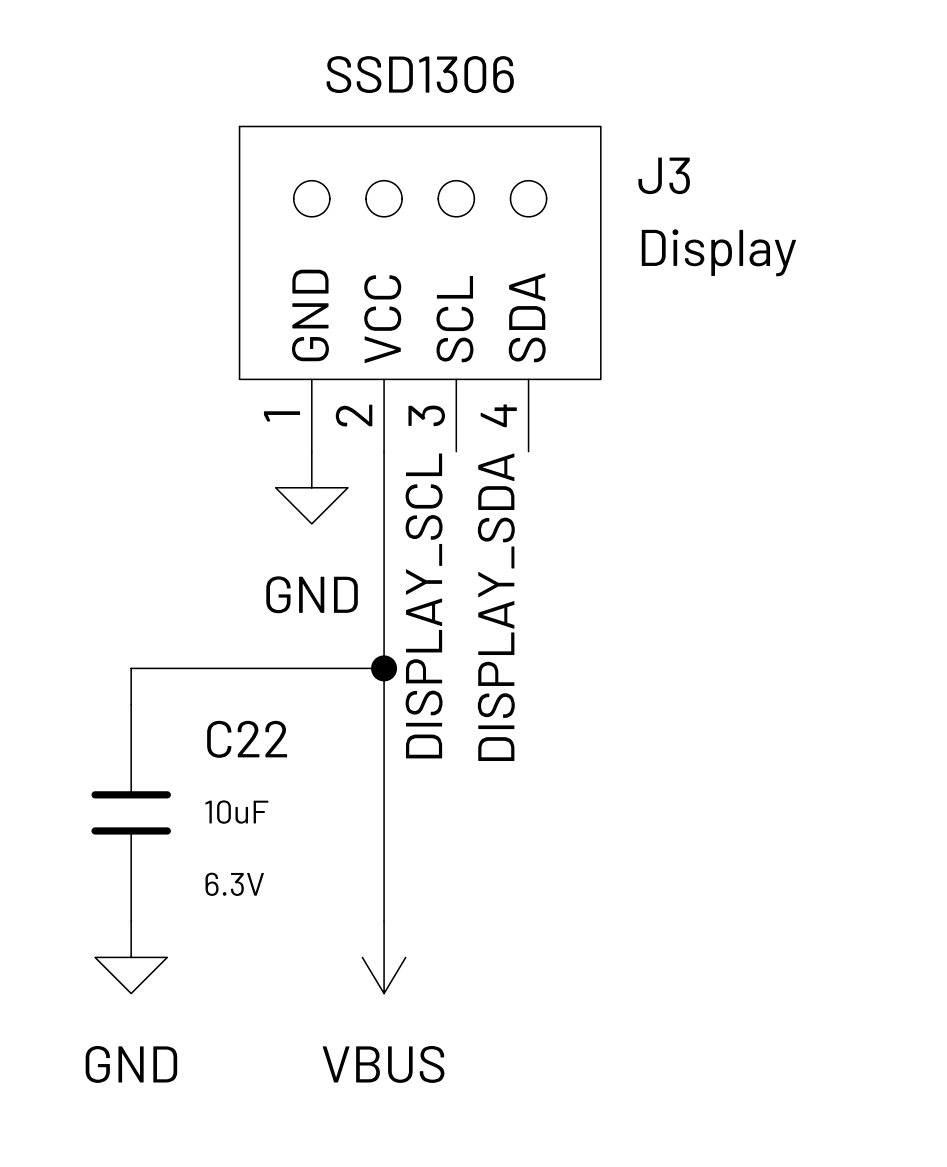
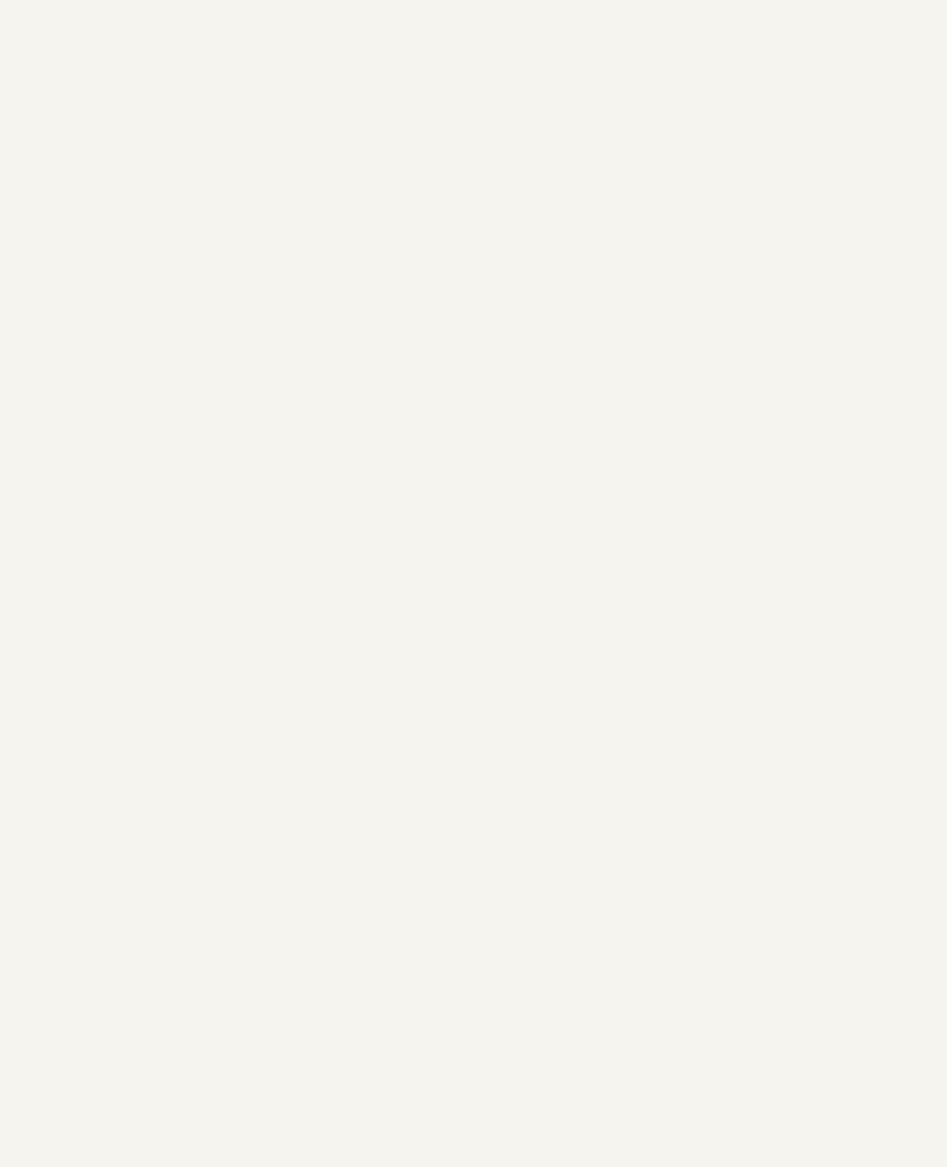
J3: Display (420, 289) -> none
wire: (384, 451) (384, 921) -> none
power symbol: GND (311, 487) -> none
label: DISPLAY_SCL (424, 605) -> none
label: DISPLAY_SDA (496, 607) -> none
wire: (384, 668) (131, 668) (131, 704) -> none
junction: (384, 668) -> none
C22: 10uF (131, 812) -> none
power symbol: GND (131, 957) -> none
power symbol: VBUS (384, 957) -> none

